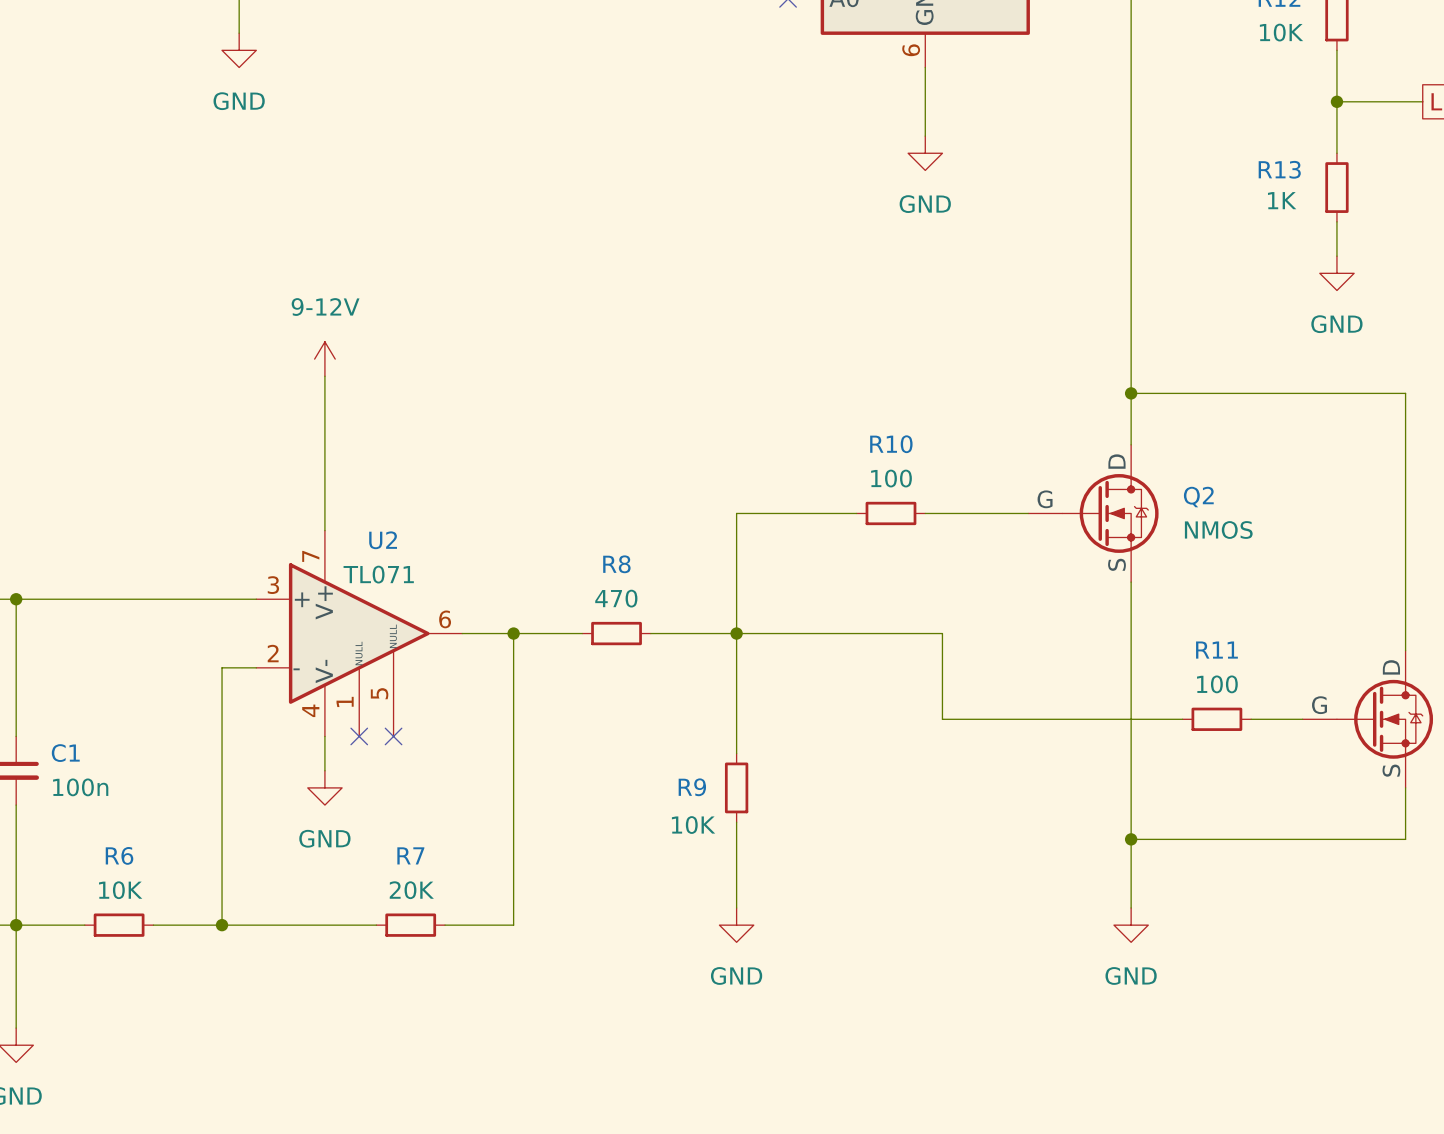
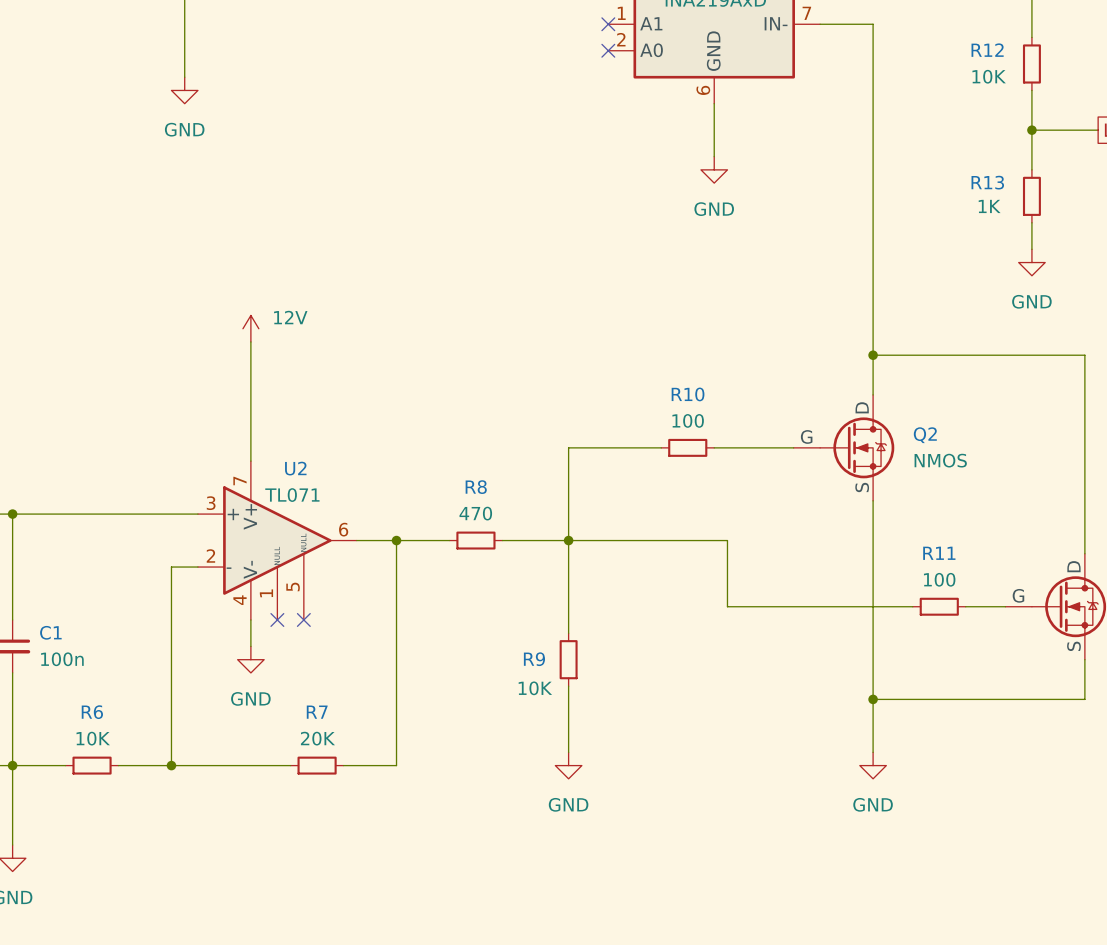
power symbol: 9-12V (324, 359) -> 12V (250, 328)

